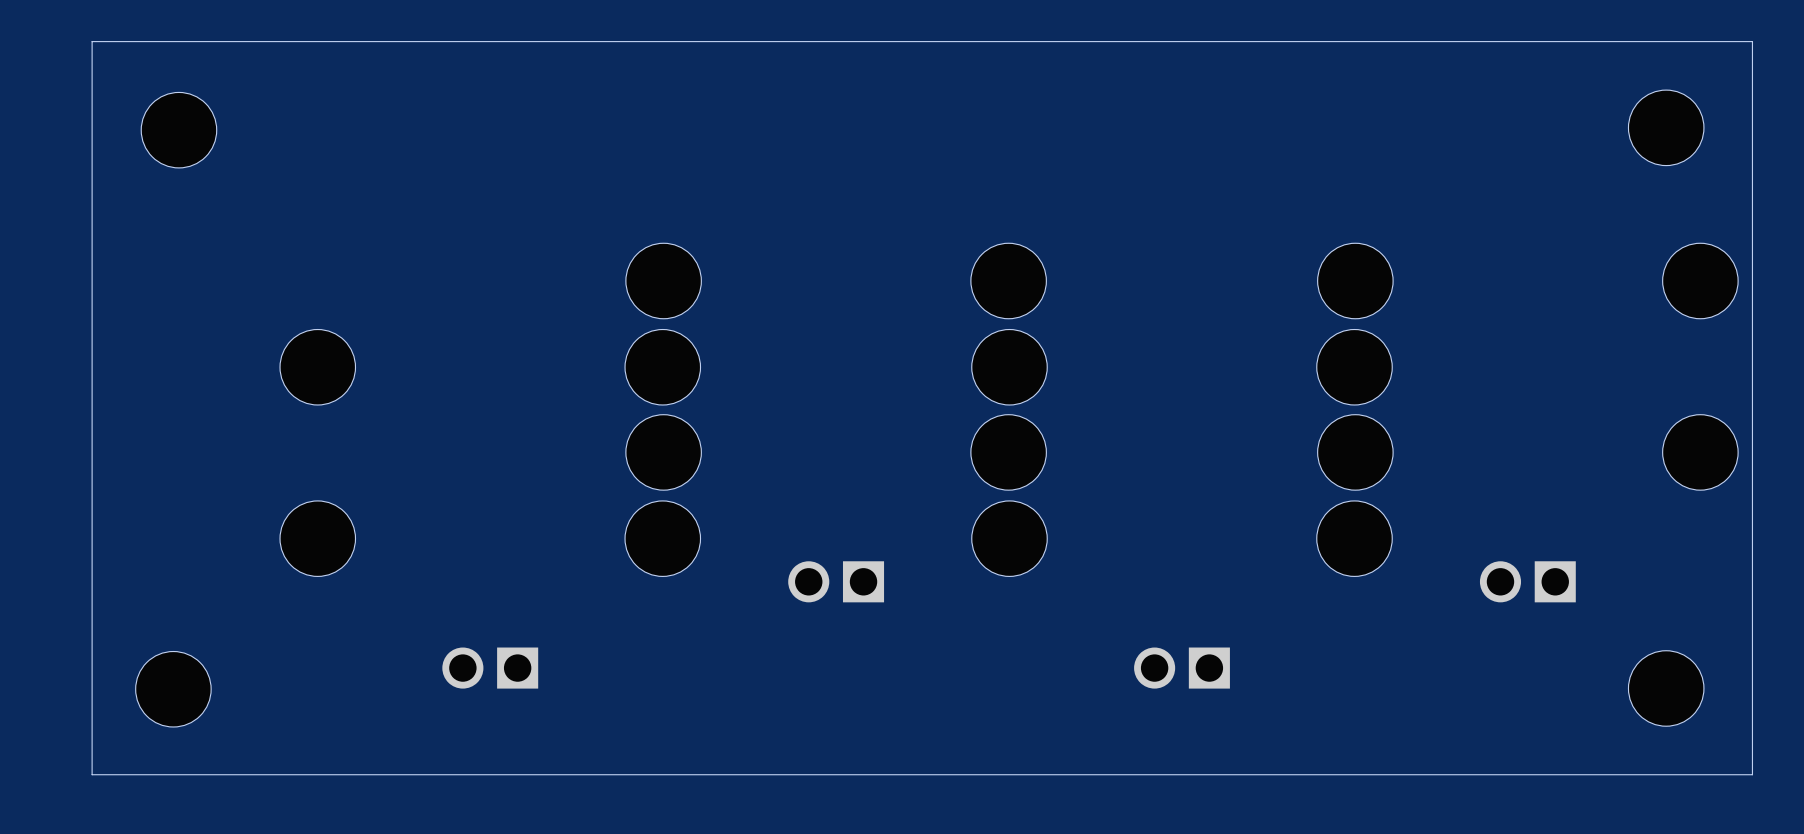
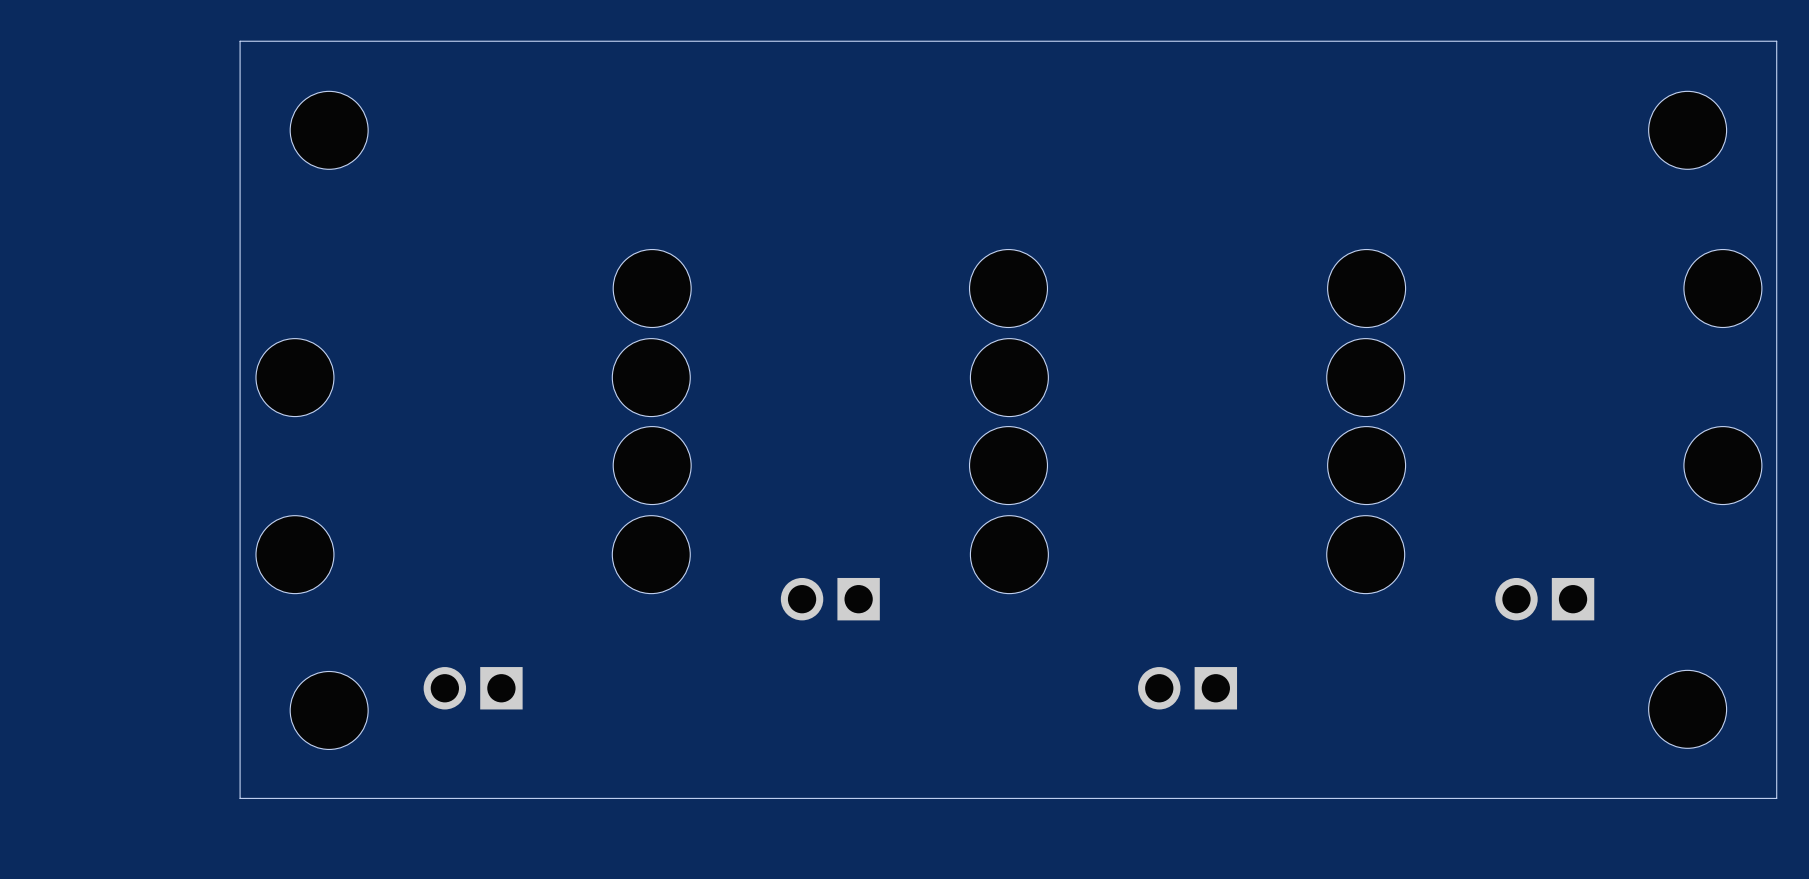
board edge: (264, 41) (92, 41) (92, 774) (264, 774) -> (240, 41) (240, 798)
part position: (178, 130) -> (329, 130)
part position: (173, 689) -> (329, 710)

